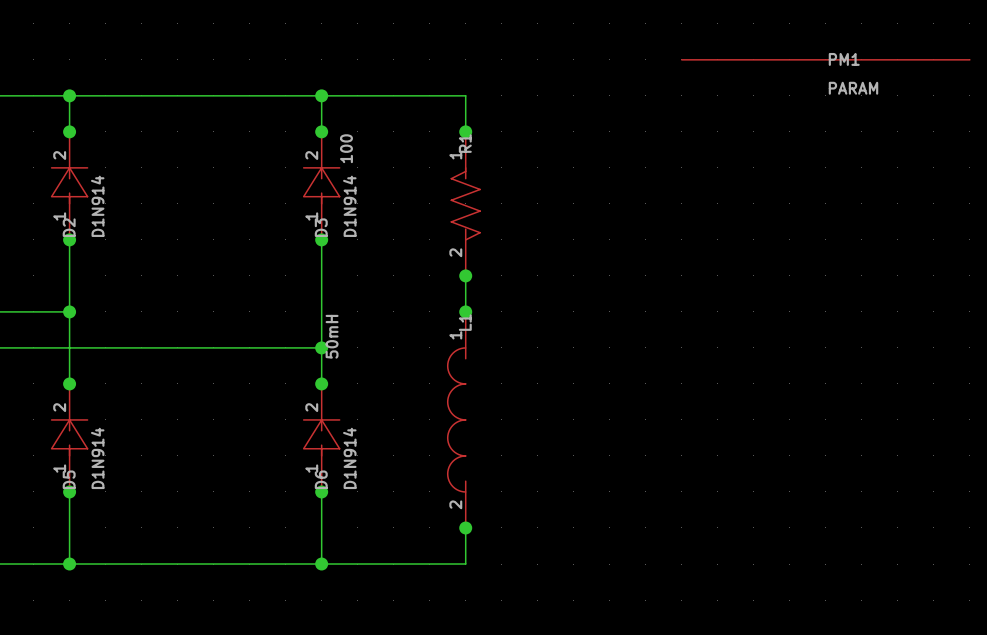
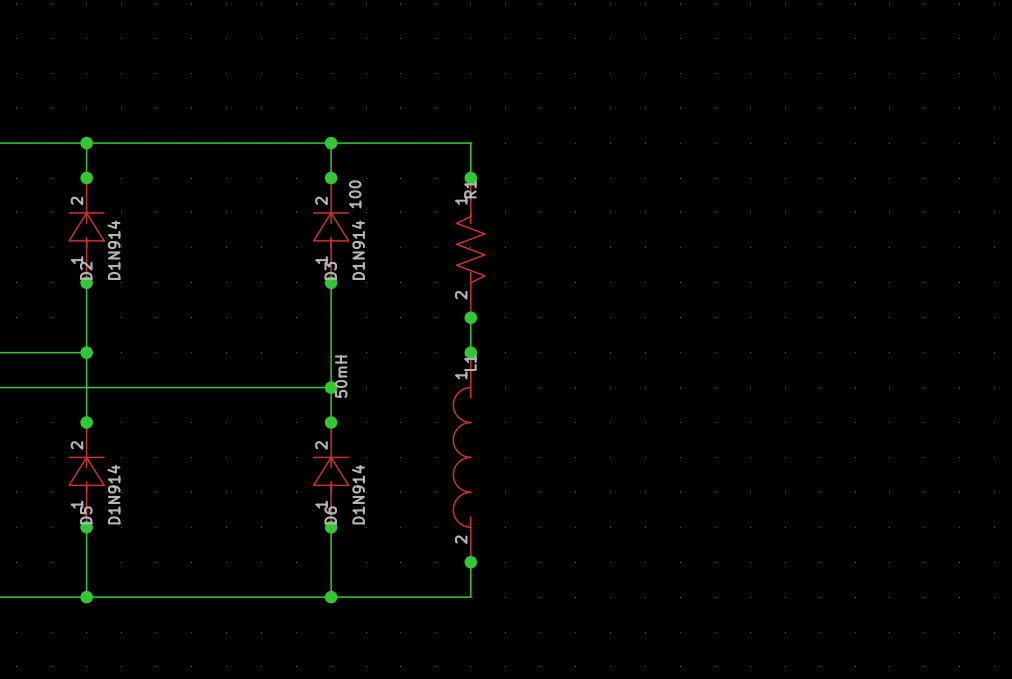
PM1: PARAM (825, 59) -> none

